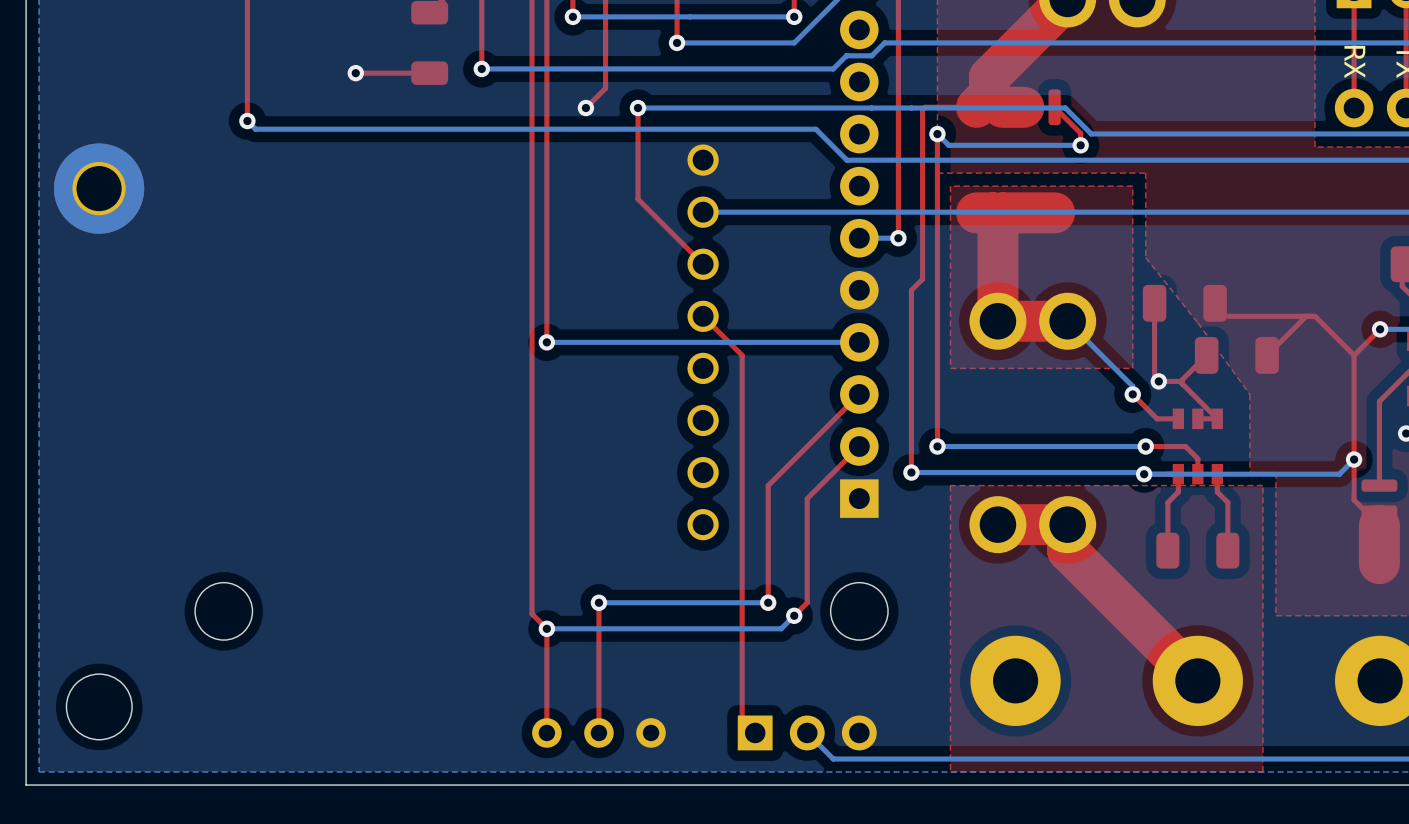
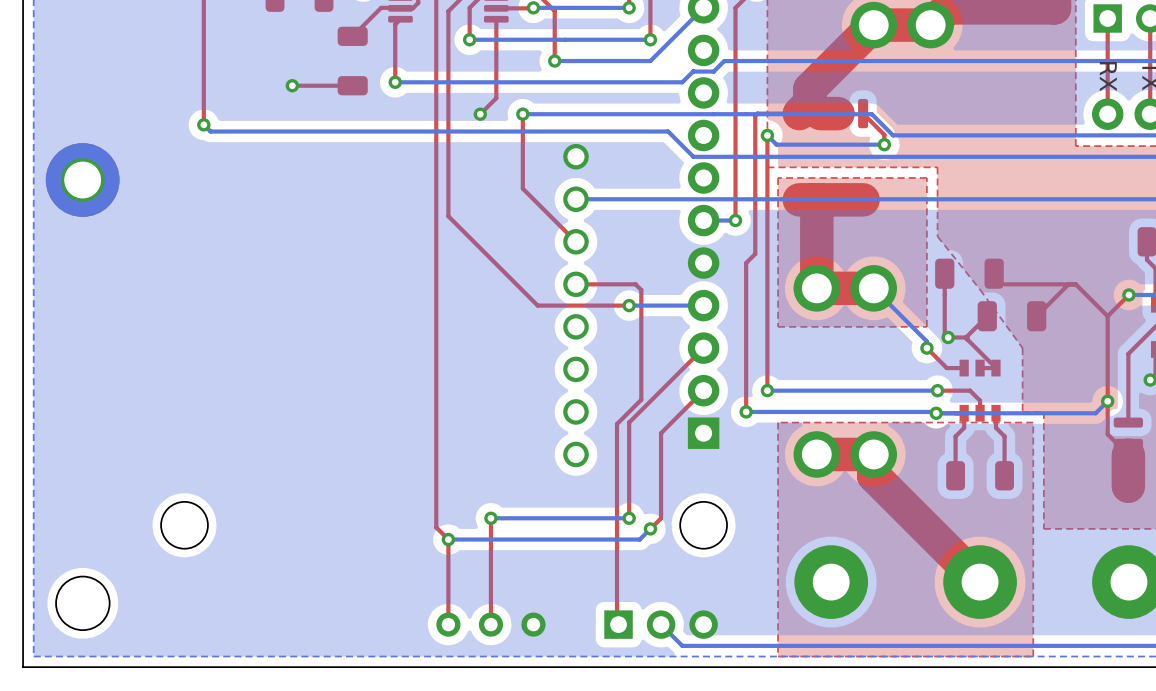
top track: (546, 233) (546, 342) -> (448, 216) (537, 305) (629, 305)
top track: (703, 316) (742, 355) (742, 719) -> (576, 284) (635, 284) (641, 290) (641, 399) (617, 424) (617, 623)
via: (546, 342) -> none
bottom track: (768, 342) (546, 342) -> none
via: none -> (629, 305)

